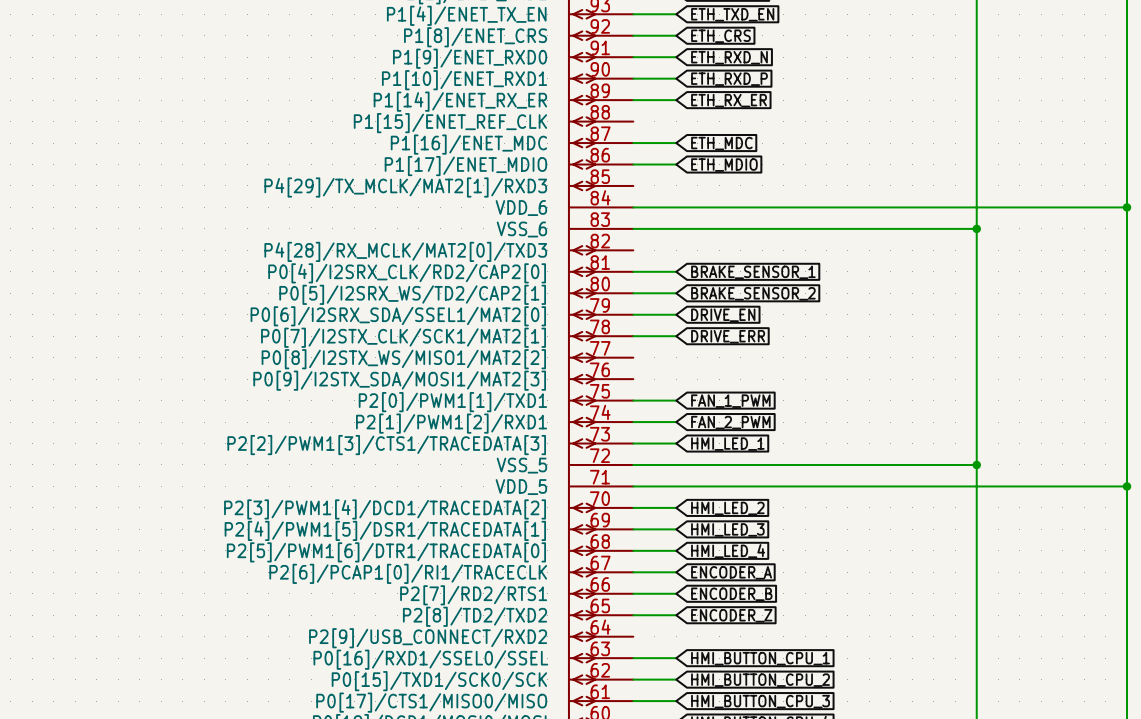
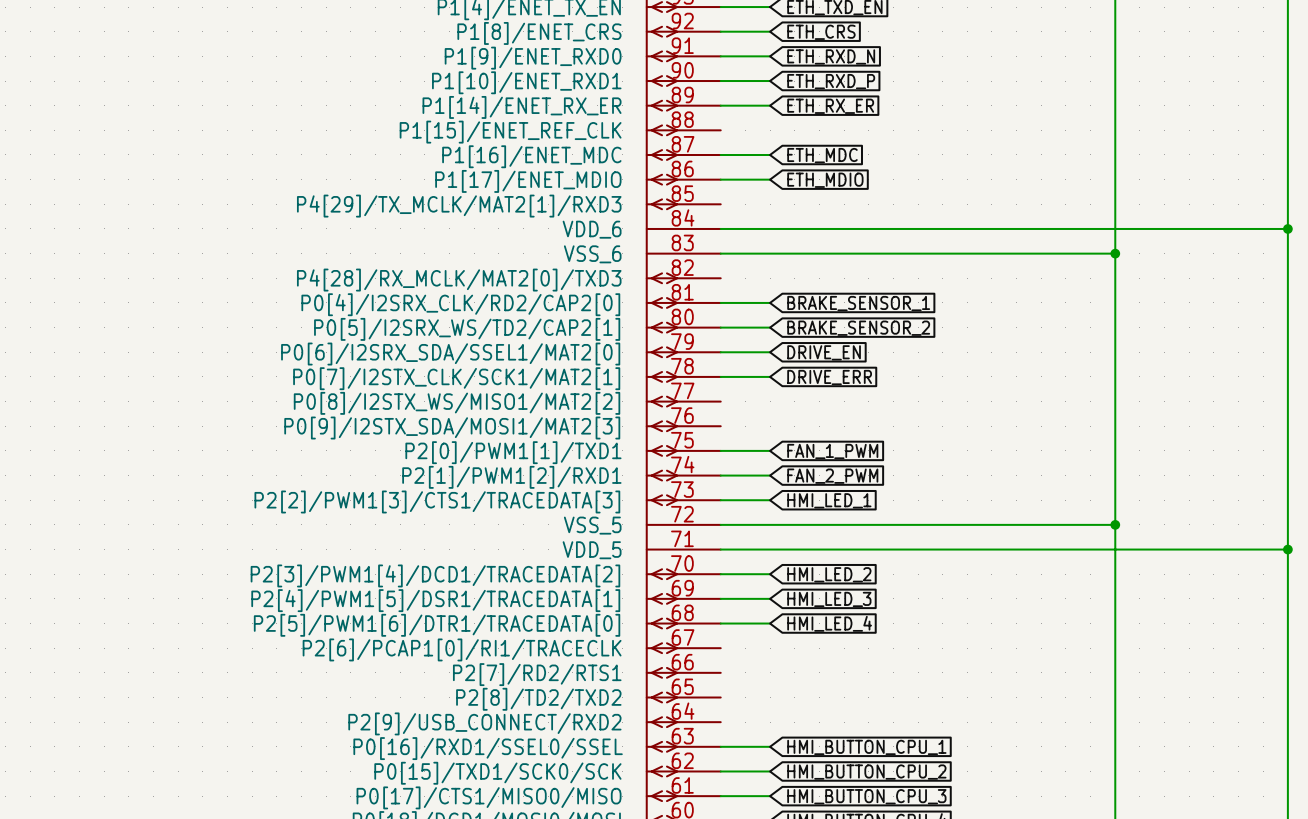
wire: (633, 572) (676, 572) -> none
global label: ENCODER_A (731, 572) -> none
wire: (633, 593) (676, 593) -> none
global label: ENCODER_B (731, 594) -> none
wire: (633, 615) (676, 615) -> none
global label: ENCODER_Z (731, 615) -> none

